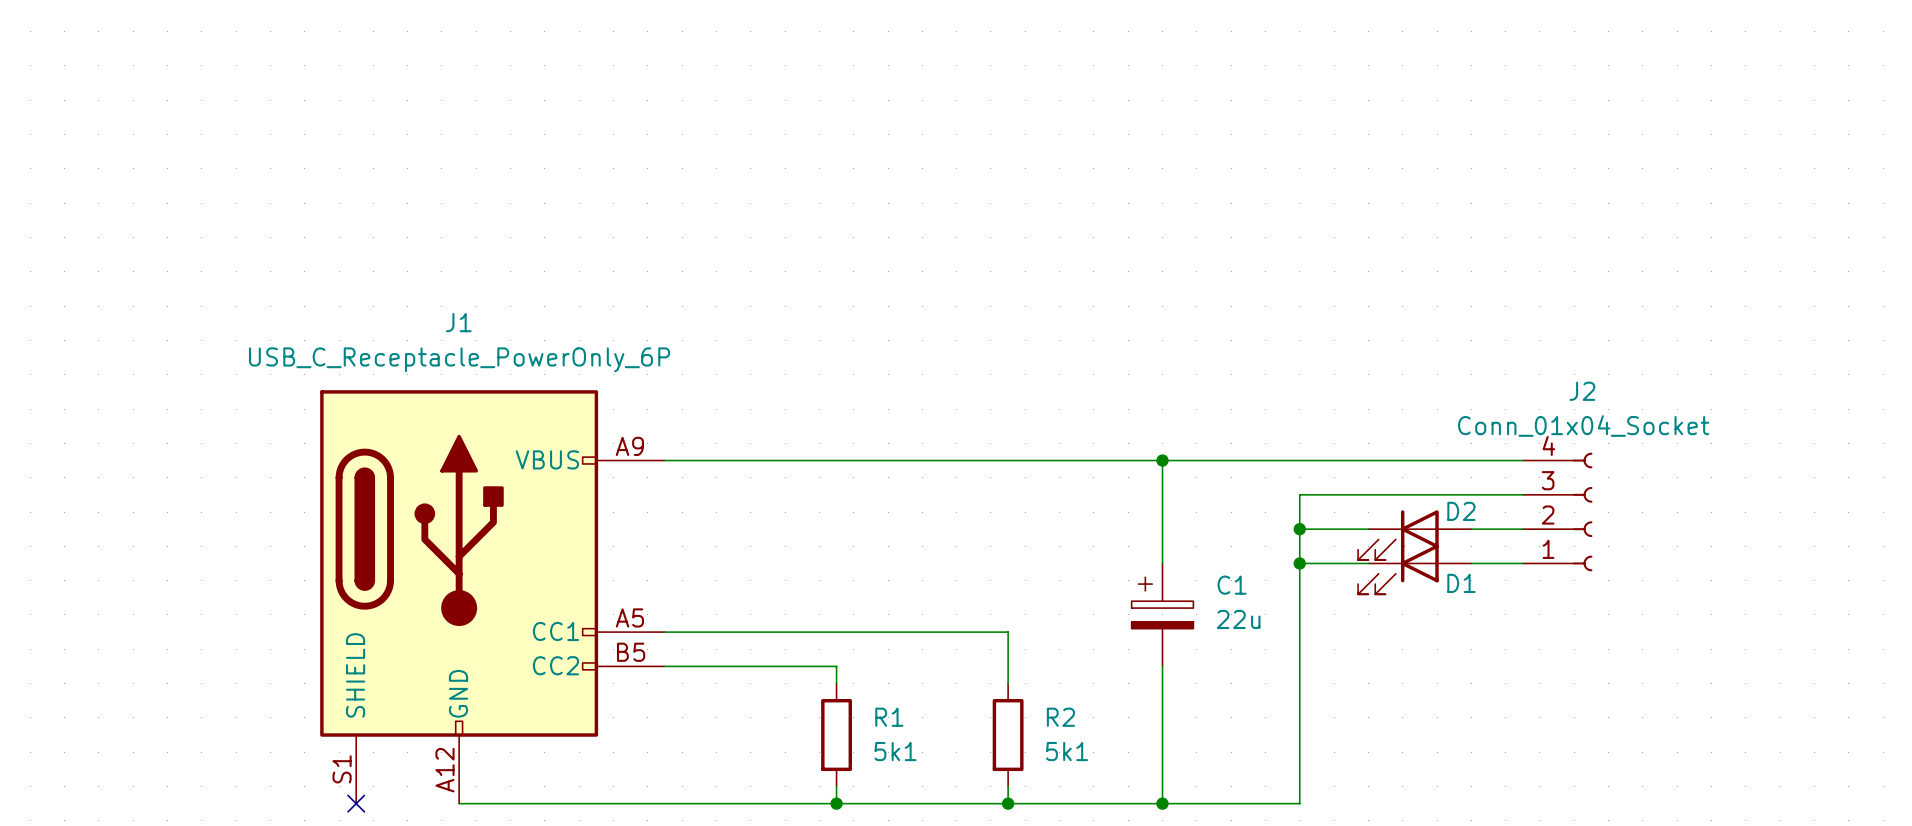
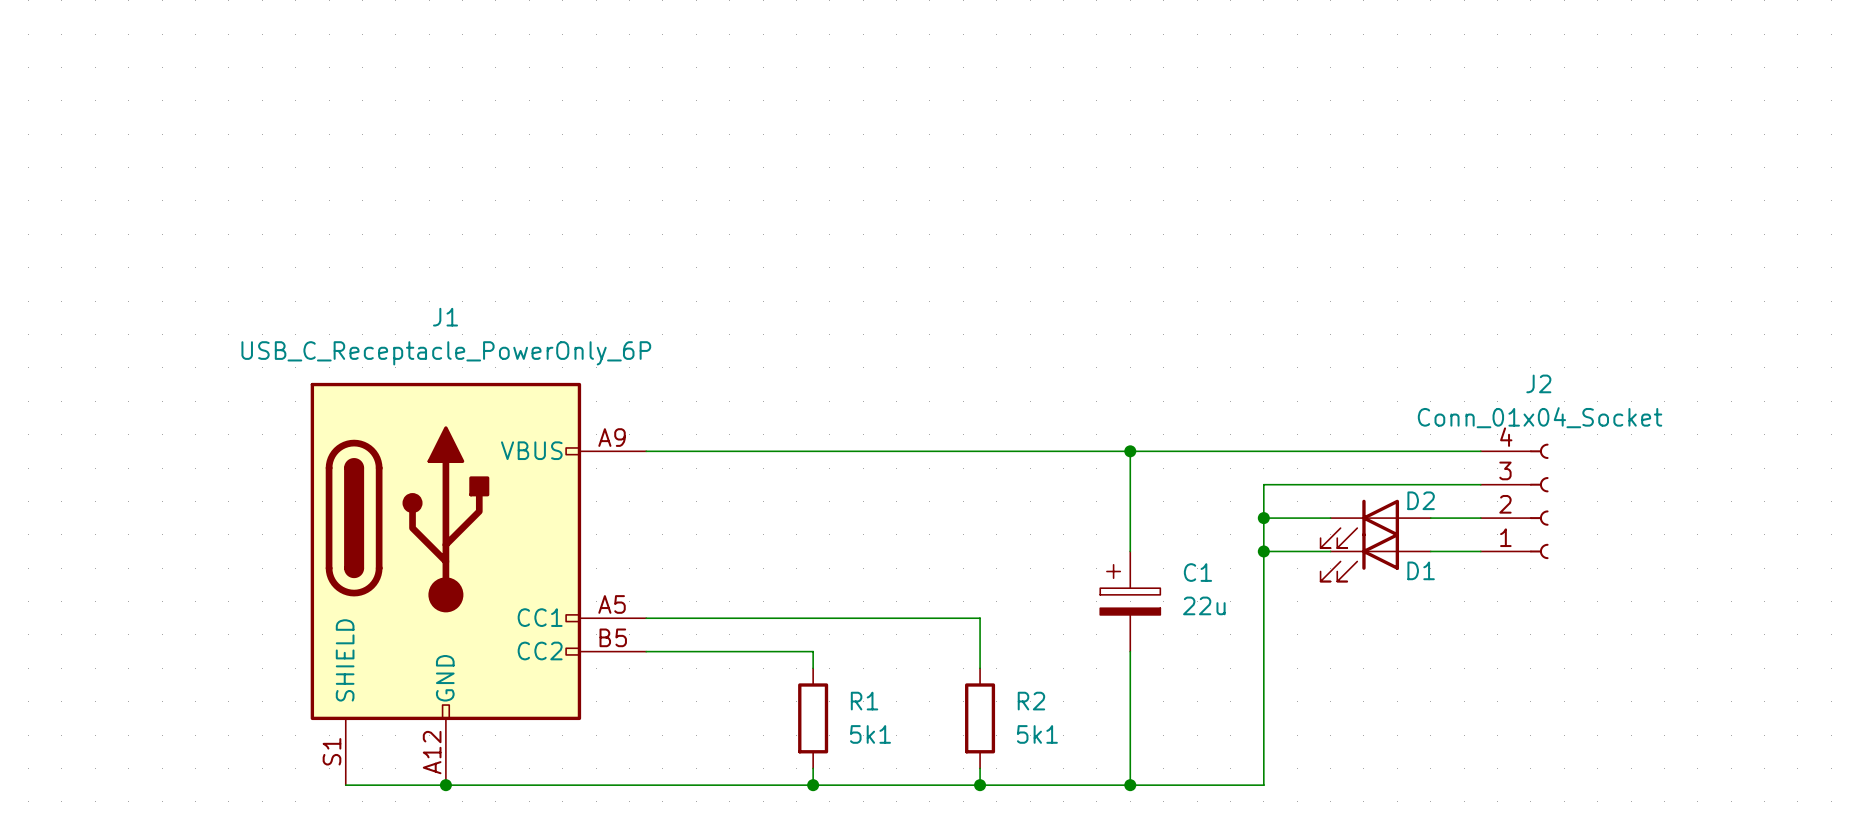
wire: none -> (345, 785) (445, 785)
no-connect mark: (356, 803) -> none
junction: none -> (445, 785)

